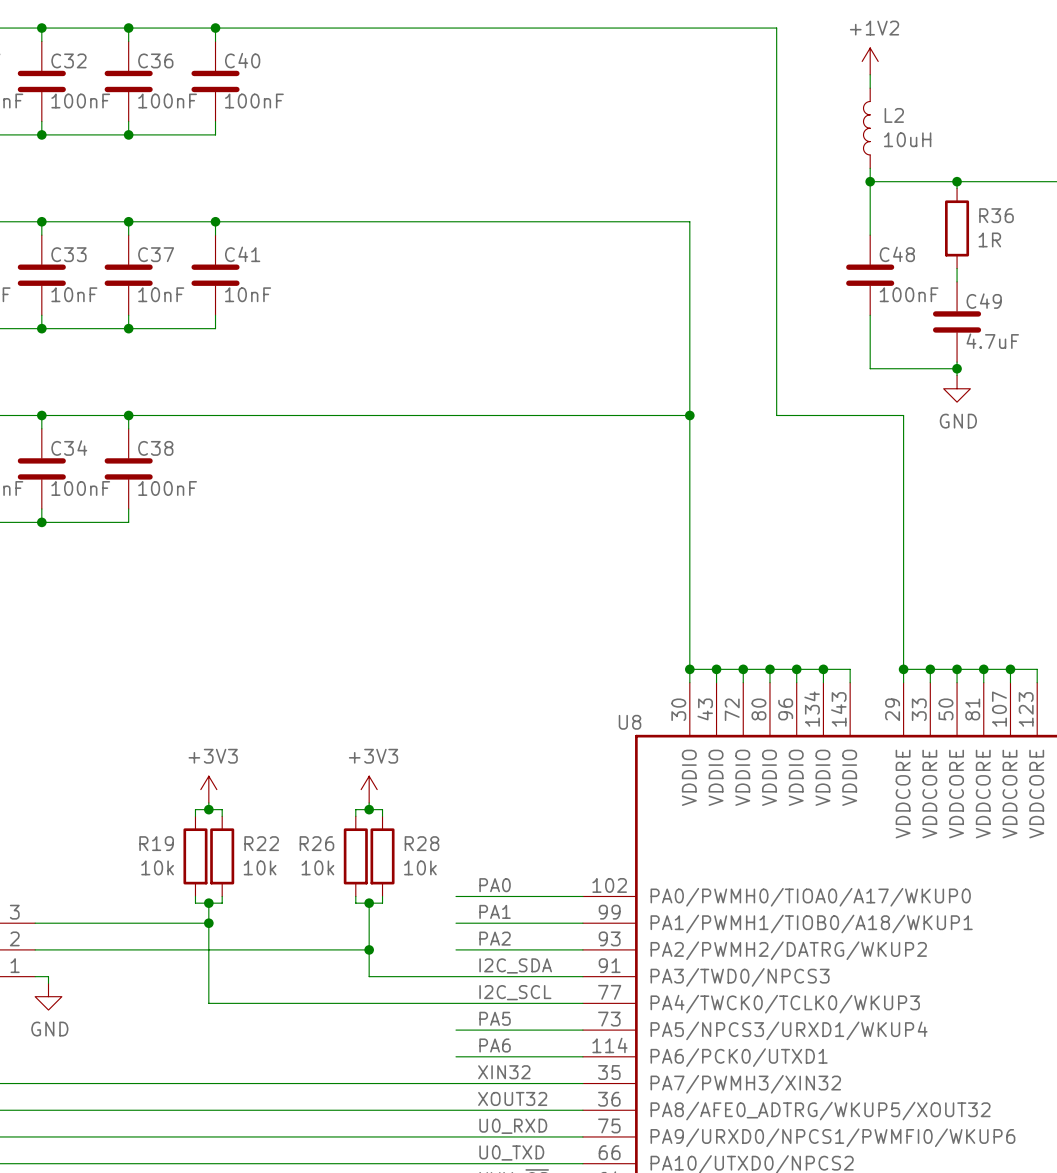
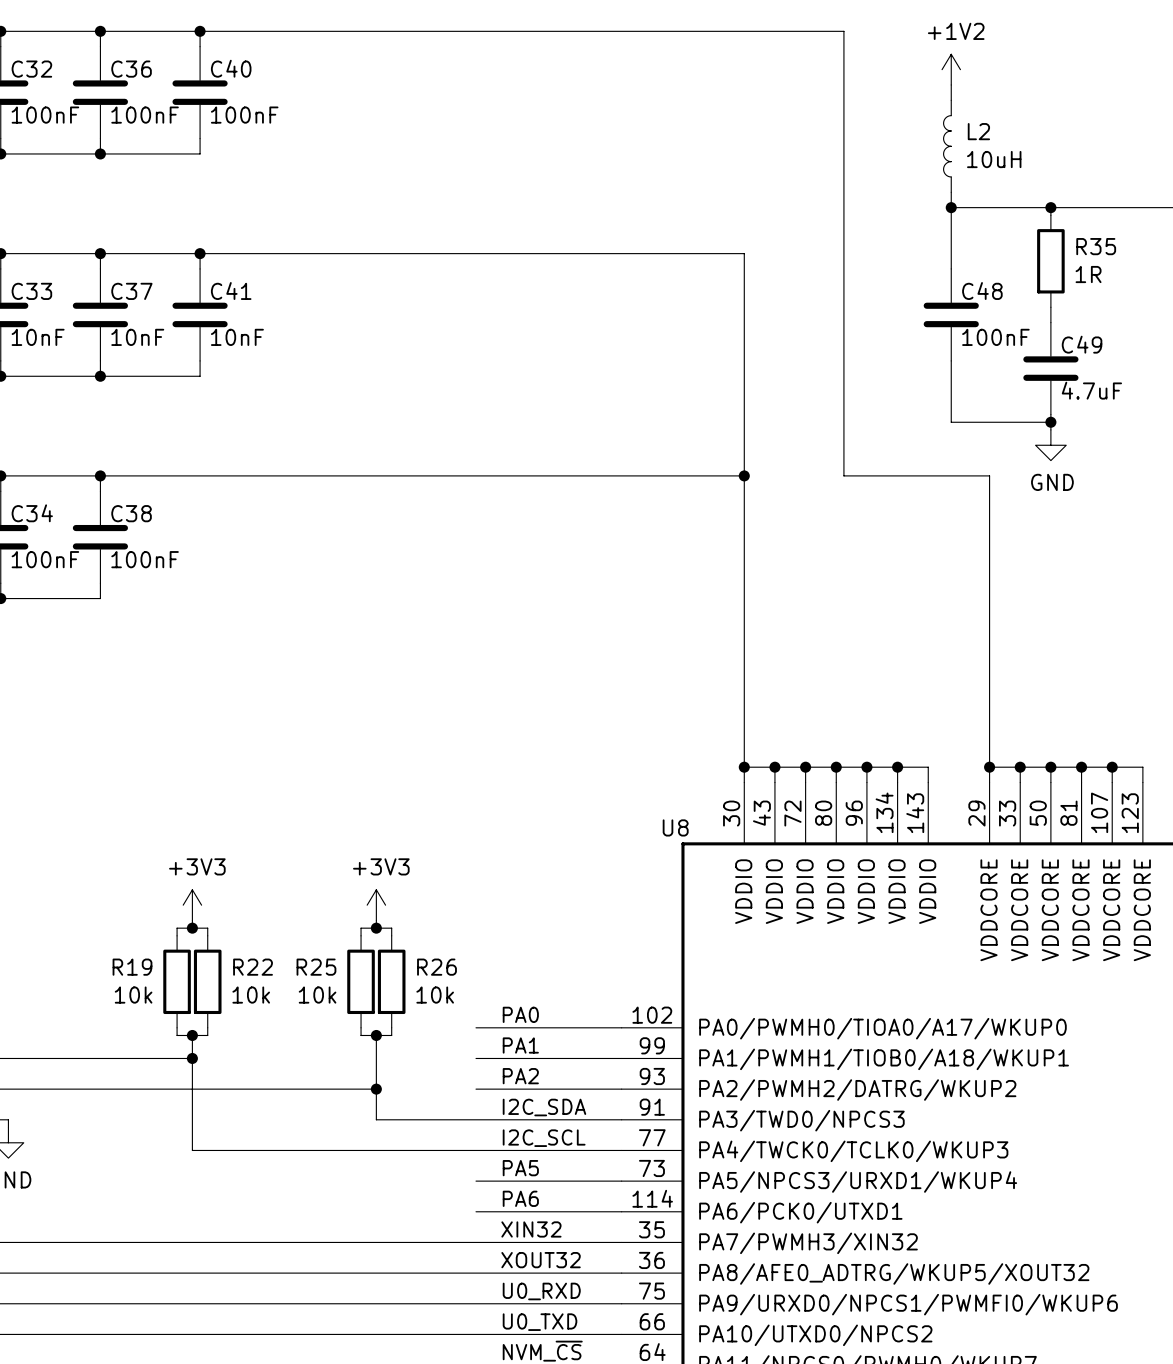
R36 name: R36 (996, 215) -> R35 (1096, 246)
R26 name: R26 (316, 843) -> R25 (316, 967)
R28 name: R28 (422, 843) -> R26 (436, 967)

